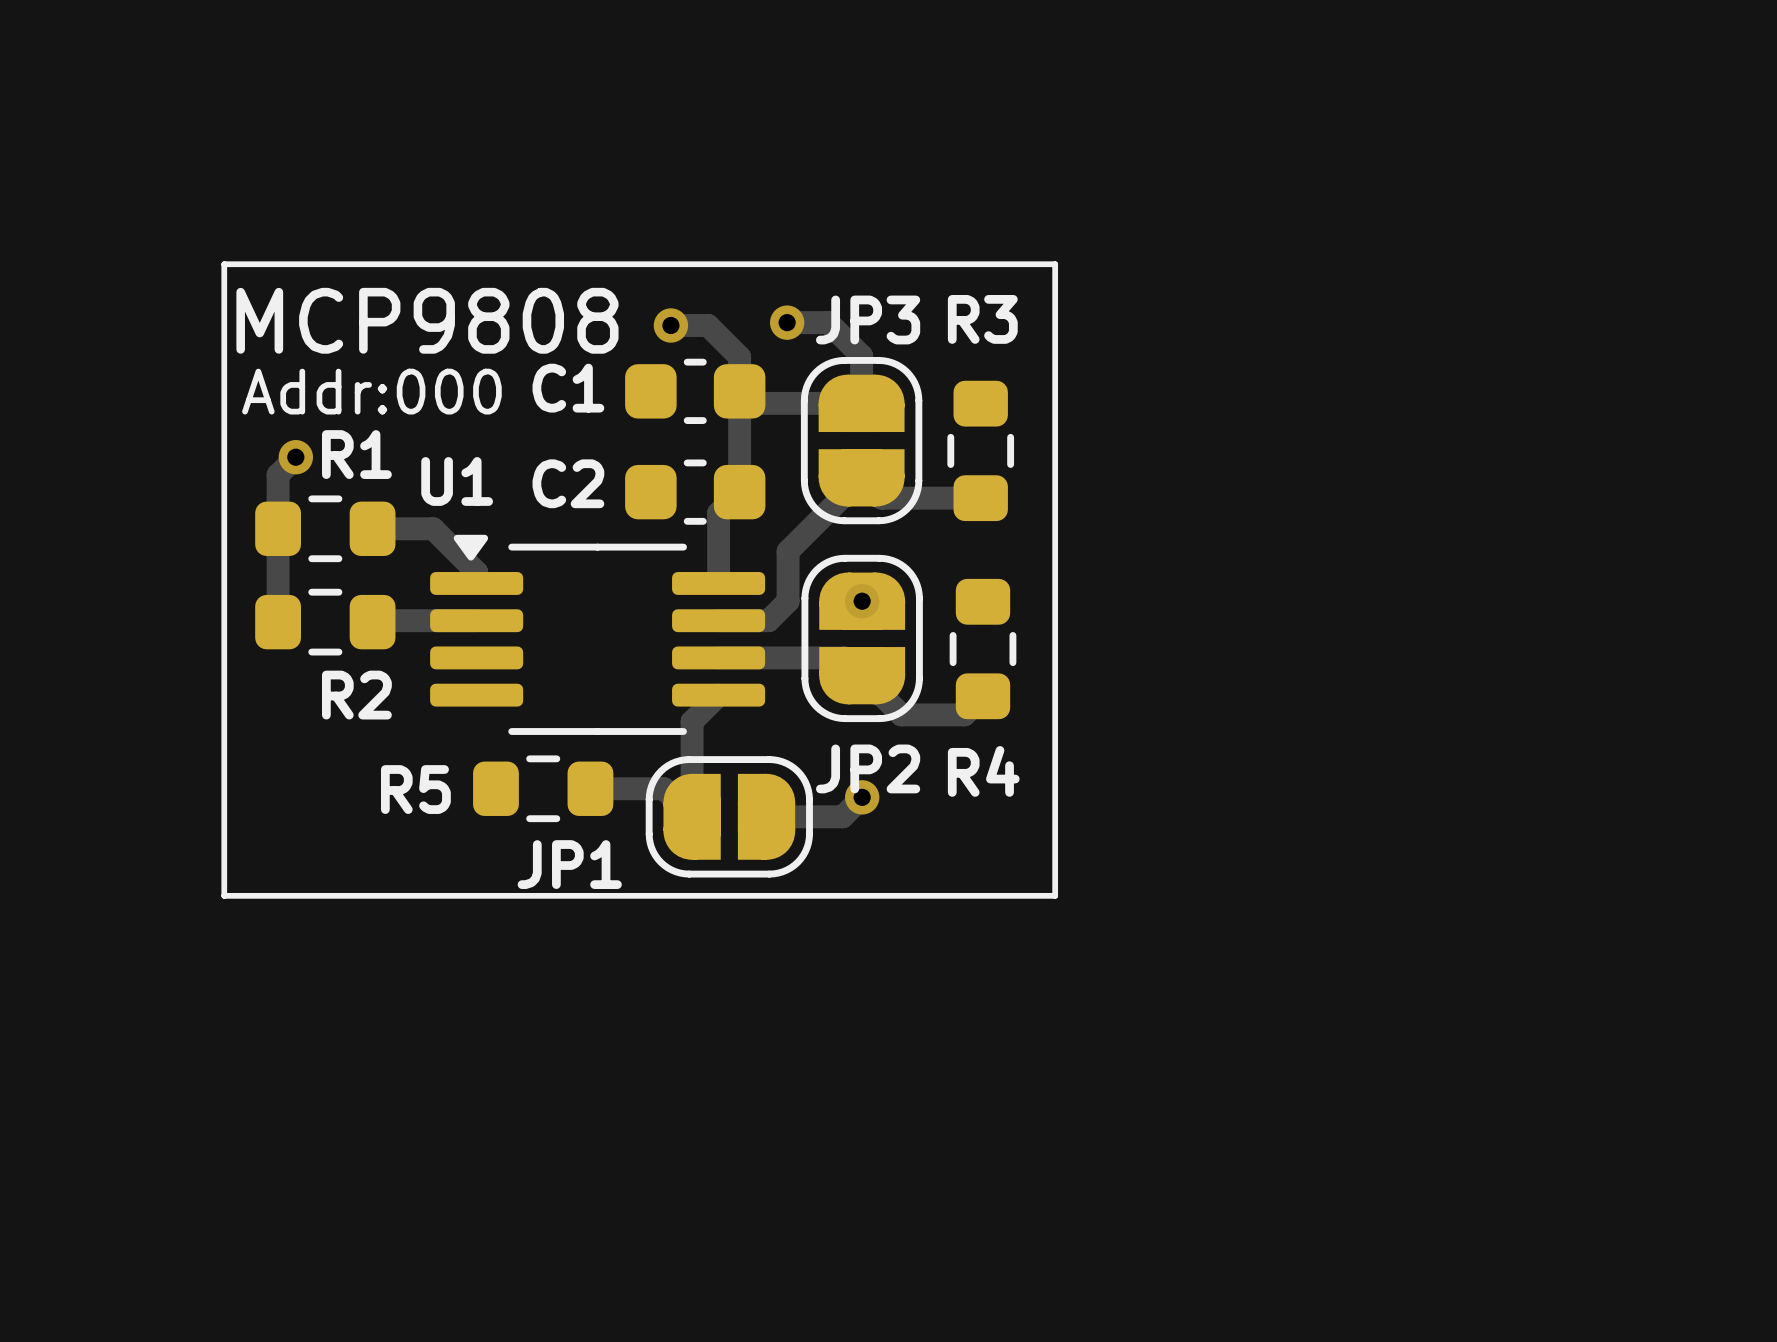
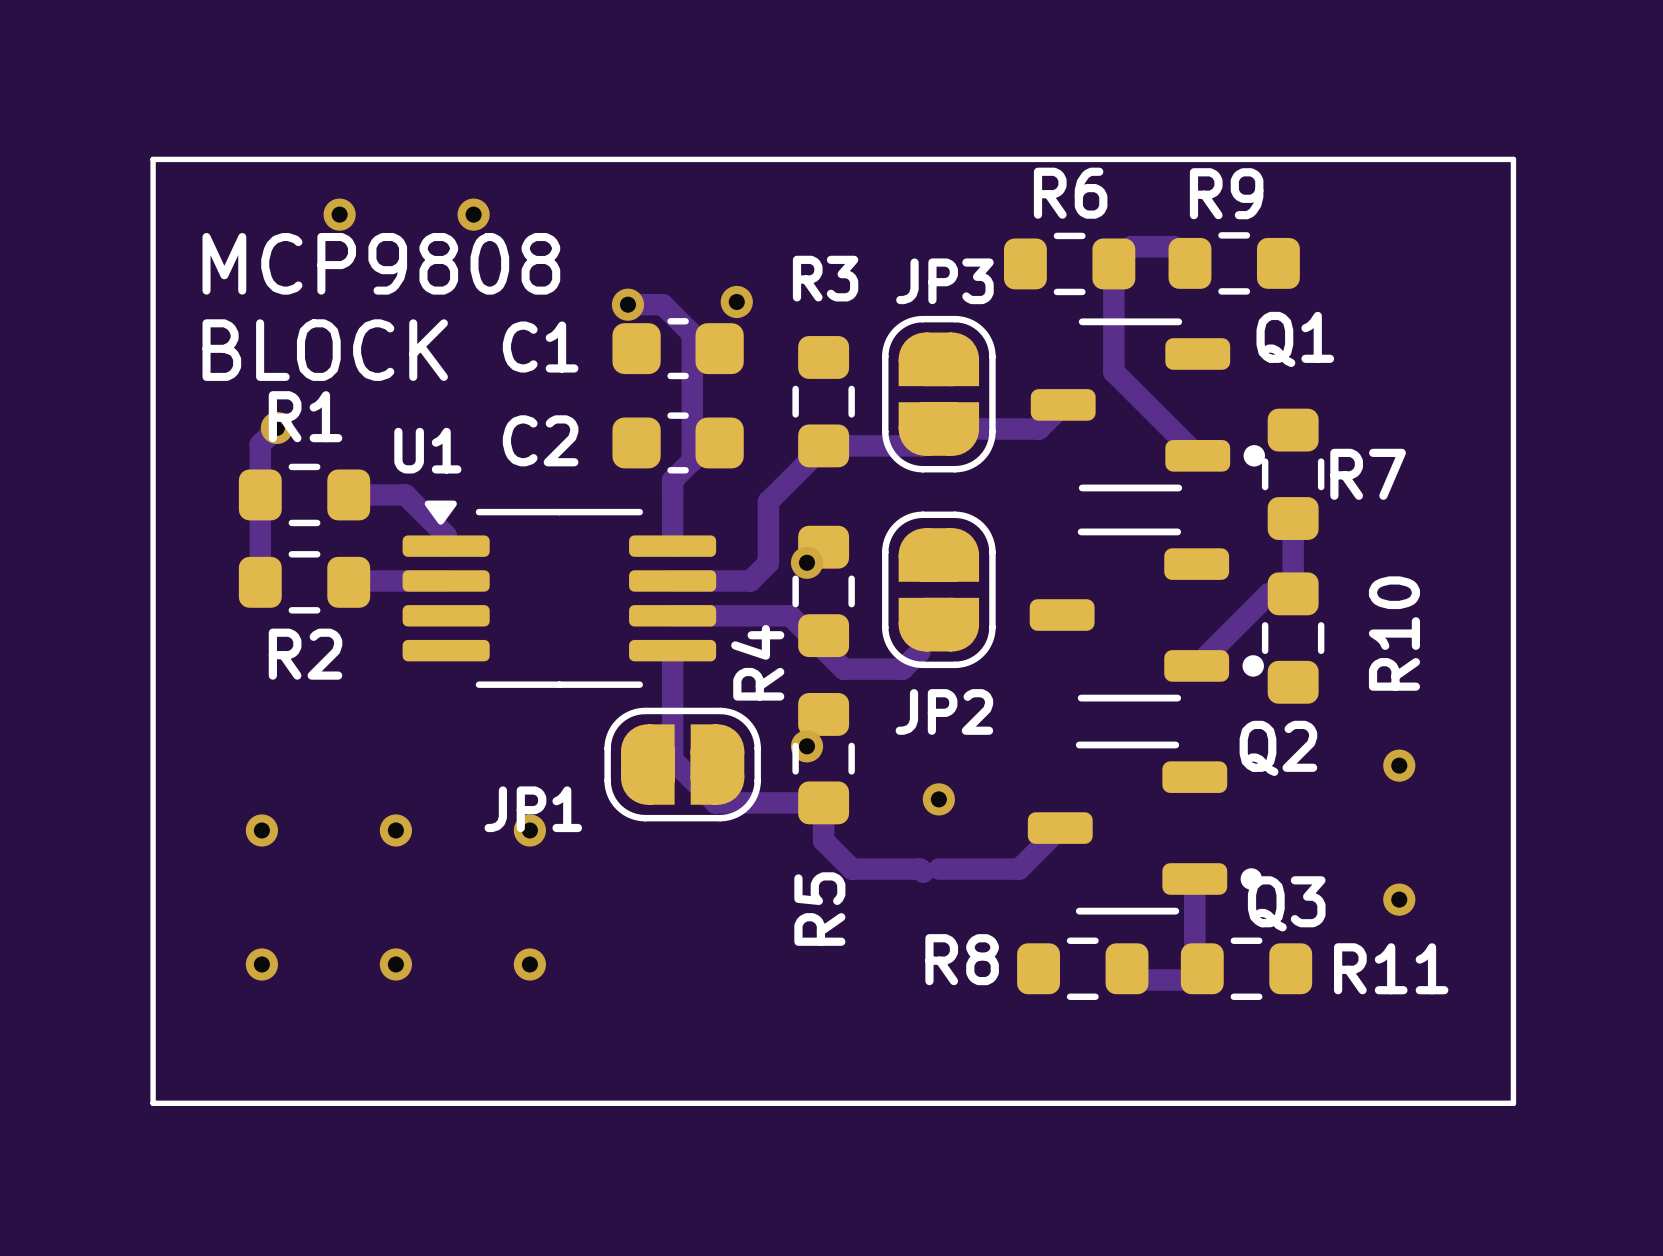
line: none -> (153, 159) (1513, 159) (1513, 1103) (153, 1103) (153, 159)
via: none -> (339, 214)
via: none -> (473, 214)
line: (224, 264) (1055, 264) (1055, 895) (224, 895) (224, 264) -> none
R6: none -> (1069, 263)
track: none -> (1189, 263) (1173, 246) (1131, 246) (1113, 263) (1113, 371) (1197, 455)
R9: none -> (1234, 263)
text position: MCP9808 (427, 320) -> MCP9808 (381, 263)
track: (787, 322) (828, 322) (861, 355) (861, 403) (751, 403) (739, 391) -> none
C1 name position: C1 (568, 388) -> C1 (540, 347)
text: Addr:000 (371, 391) -> BLOCK (325, 350)
C1 position: (695, 391) -> (678, 348)
track: none -> (1063, 404) (1039, 429) (938, 429) (921, 445) (823, 445)
Q1: none -> (1147, 404)
JP3 position: (861, 440) -> (938, 394)
R3 position: (980, 450) -> (823, 401)
R1 name position: R1 (356, 454) -> R1 (305, 416)
C2 name position: C2 (568, 483) -> C2 (540, 440)
C2 position: (695, 492) -> (678, 442)
track: (980, 498) (881, 498) (861, 477) (788, 551) (788, 601) (768, 620) -> (824, 445) (768, 501) (768, 563) (750, 580) (719, 580)
R7: none -> (1293, 474)
track: none -> (1293, 518) (1293, 593) (1268, 593) (1196, 665)
JP2 position: (862, 638) -> (938, 589)
R4 position: (983, 649) -> (823, 591)
Q2: none -> (1146, 615)
R10: none -> (1293, 638)
R2 name position: R2 (356, 695) -> R2 (305, 654)
track: (718, 695) (692, 721) (692, 816) (664, 788) (590, 788) -> (672, 650) (672, 759) (715, 802) (823, 802) (823, 840) (852, 869) (920, 869) (923, 872)
R4 name rotation: 0° (983, 771) -> 90° counterclockwise (757, 662)
R5 rotation: 0° (543, 788) -> 90° clockwise (823, 758)
R5 position: (543, 788) -> (823, 758)
R5 name position: R5 (415, 789) -> R5 (819, 909)
track: (862, 797) (842, 816) (766, 816) -> none
via: none -> (1399, 765)
via: none -> (938, 799)
track: none -> (1060, 828) (1019, 869) (938, 869)
Q3: none -> (1144, 828)
via: none -> (261, 830)
via: none -> (395, 830)
via: none -> (529, 830)
track: none -> (1194, 878) (1194, 961) (1202, 968) (1191, 980) (1138, 980) (1126, 968)
via: none -> (1399, 899)
via: none -> (261, 964)
via: none -> (395, 964)
via: none -> (529, 964)
R8: none -> (1082, 968)
R11: none -> (1246, 968)

